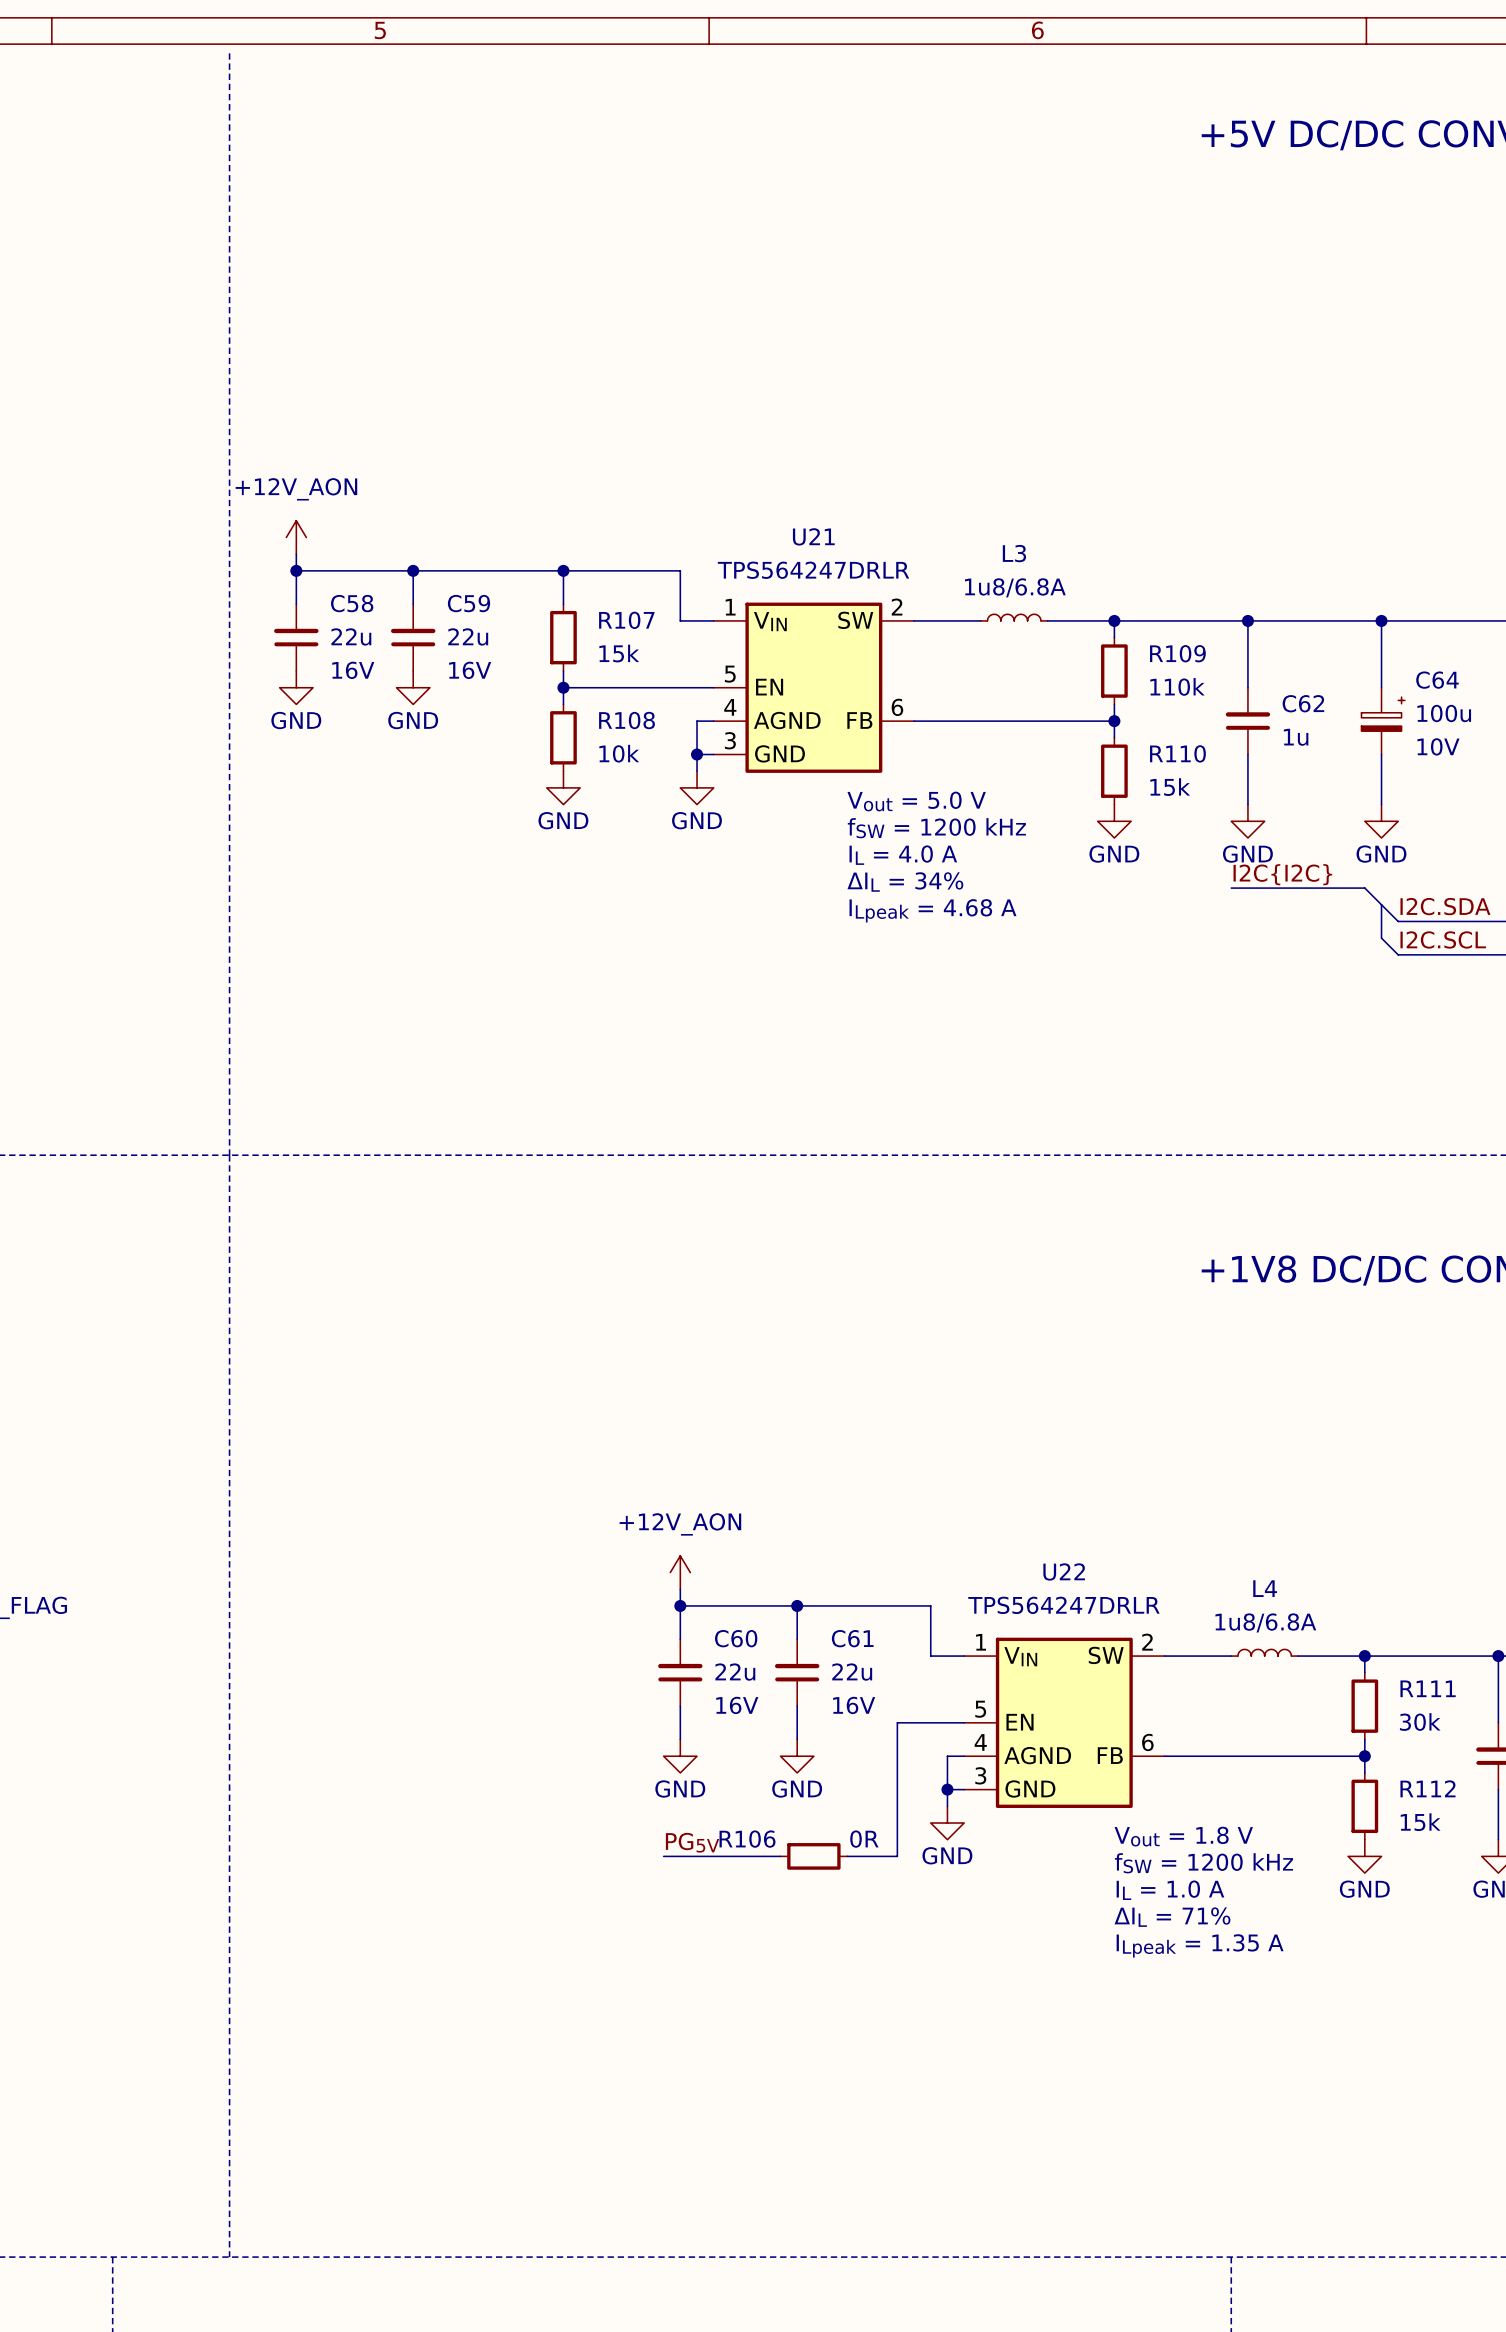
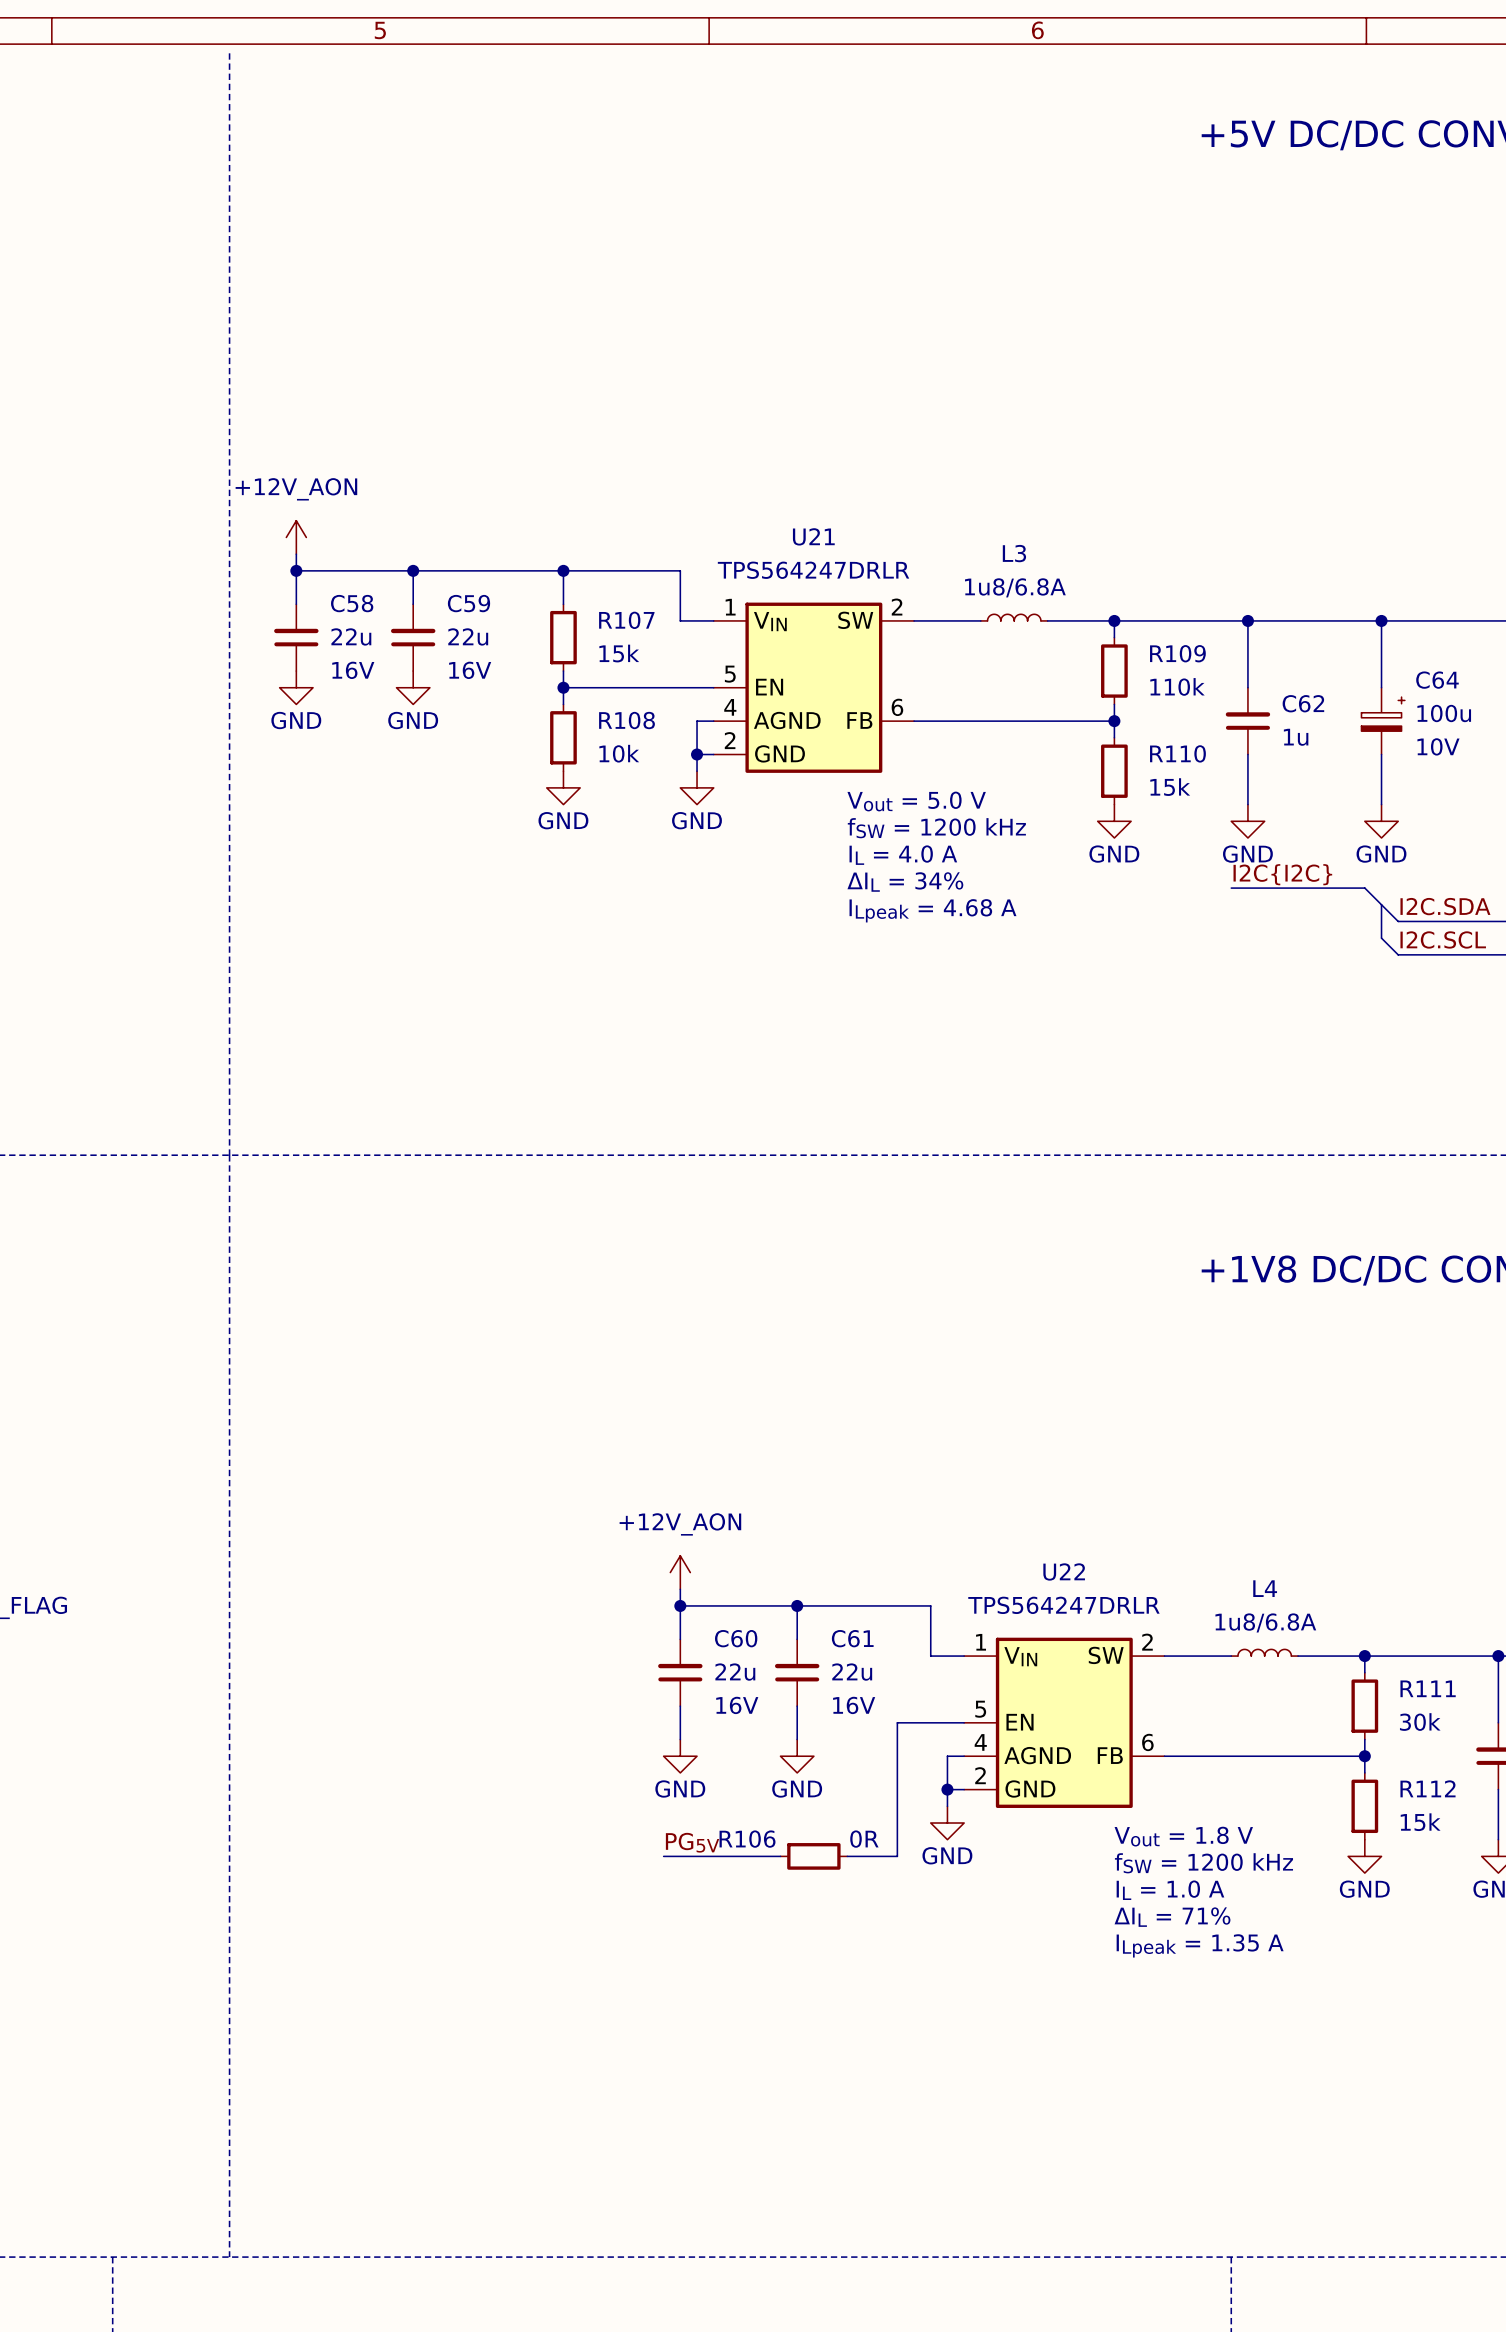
U21 pin number: 3 (730, 740) -> 2 (730, 740)
U22 pin number: 3 (980, 1775) -> 2 (980, 1775)

